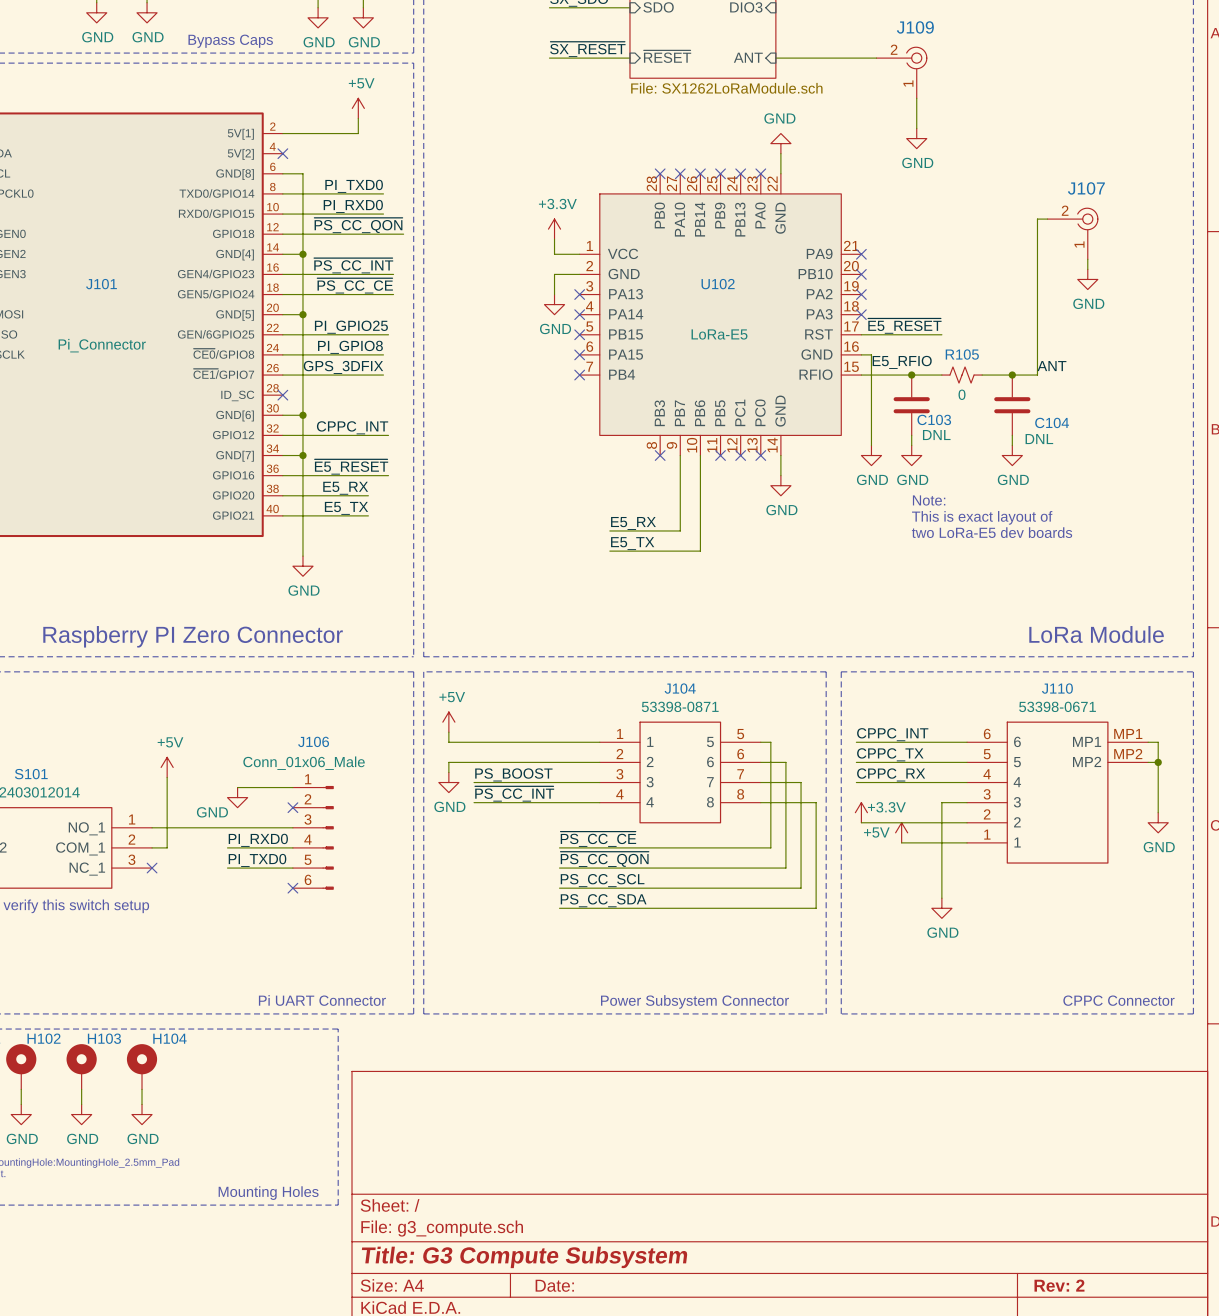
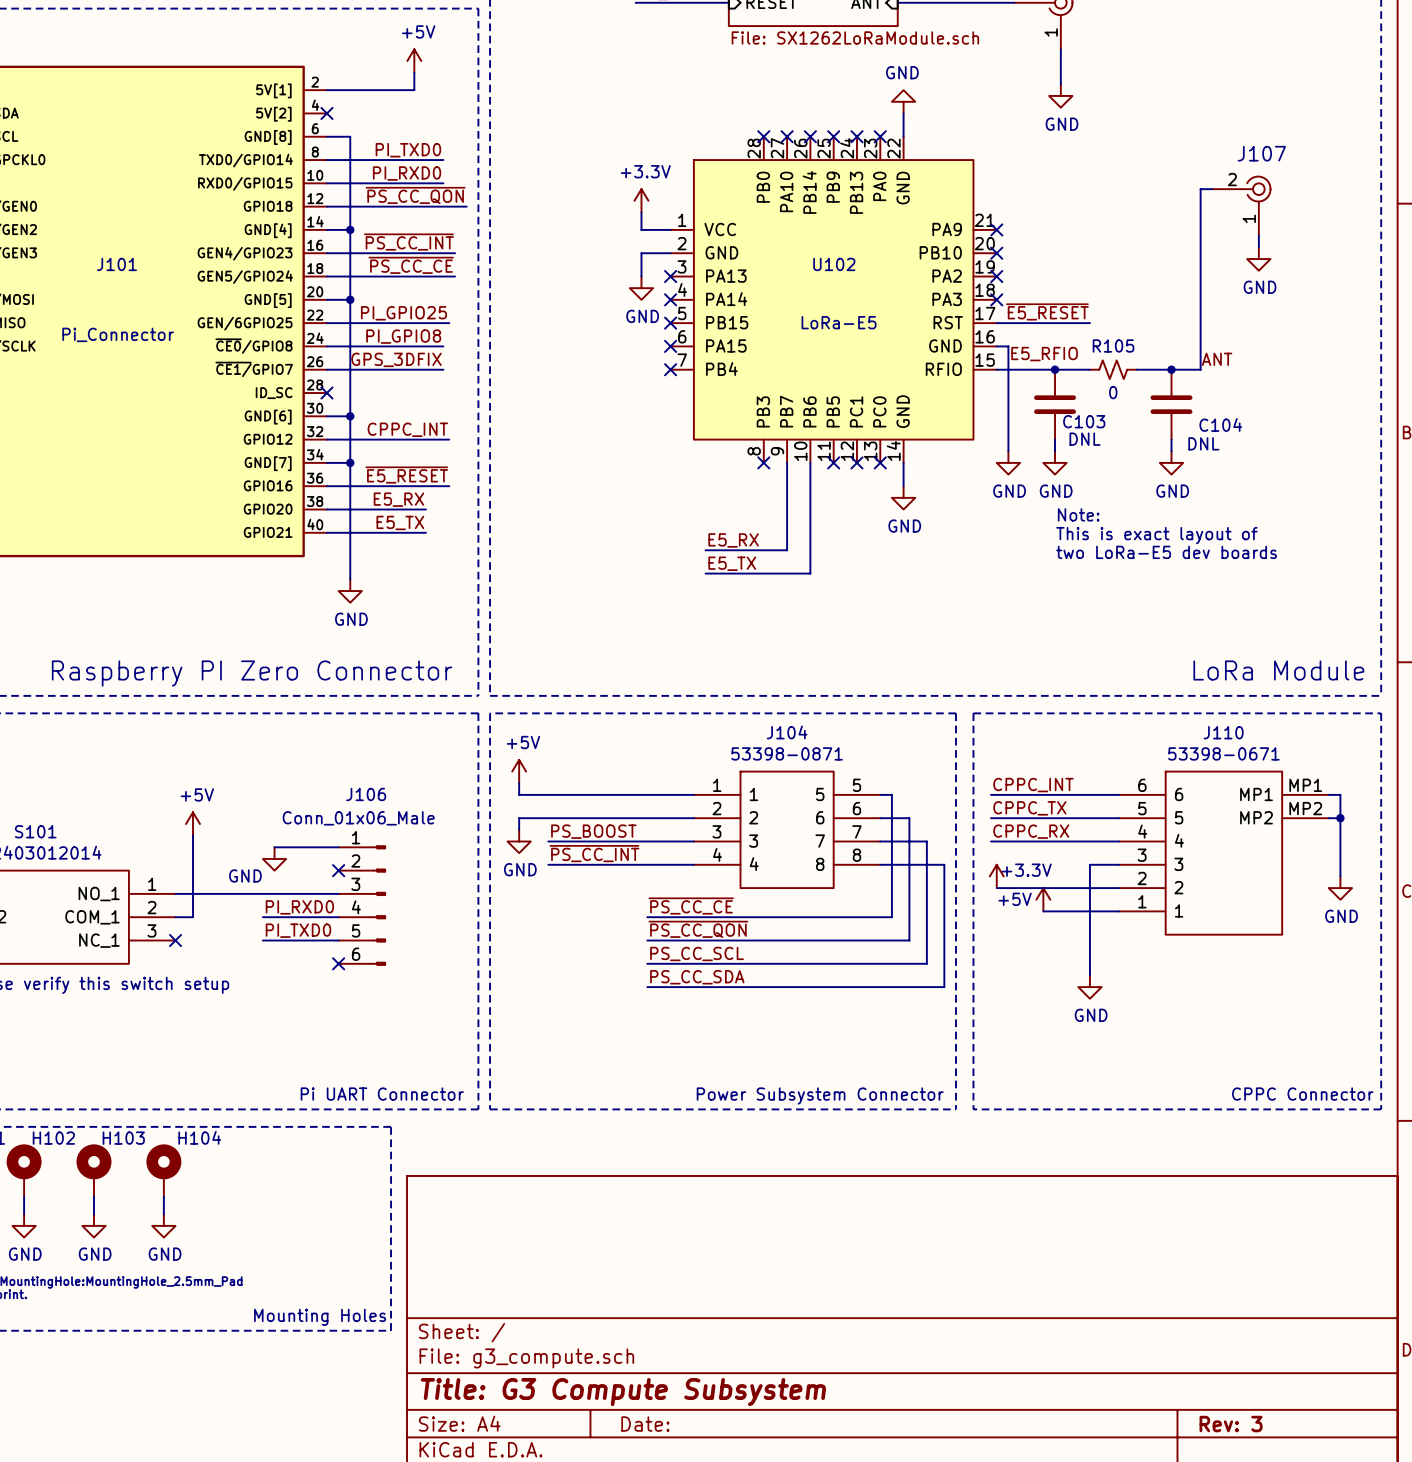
title block: Rev: 2 (1059, 1285) -> Rev: 3 (1231, 1424)

